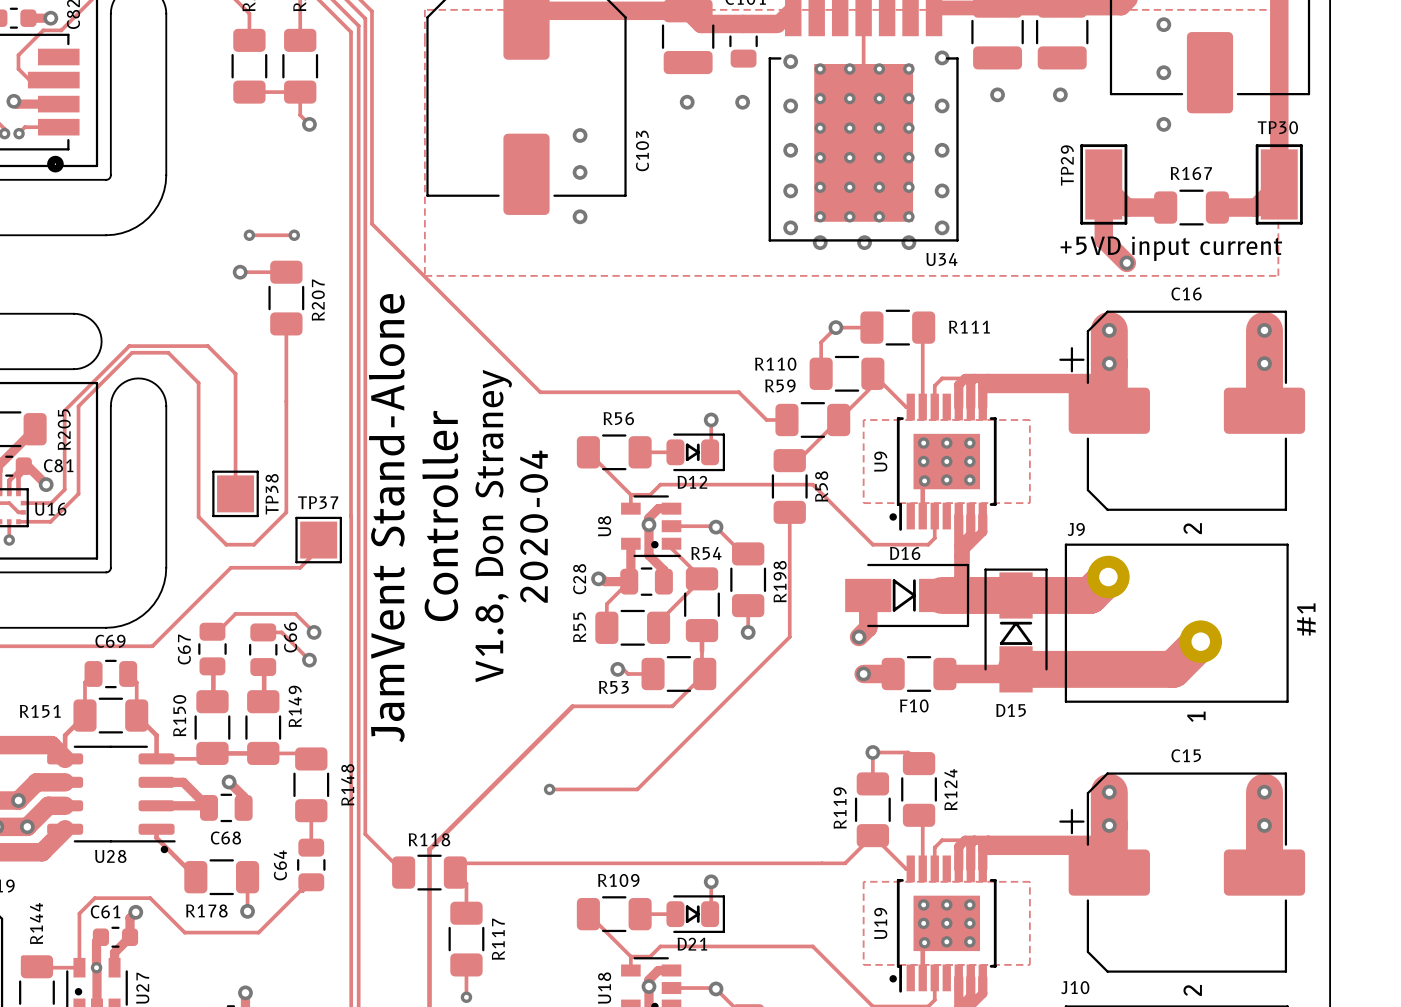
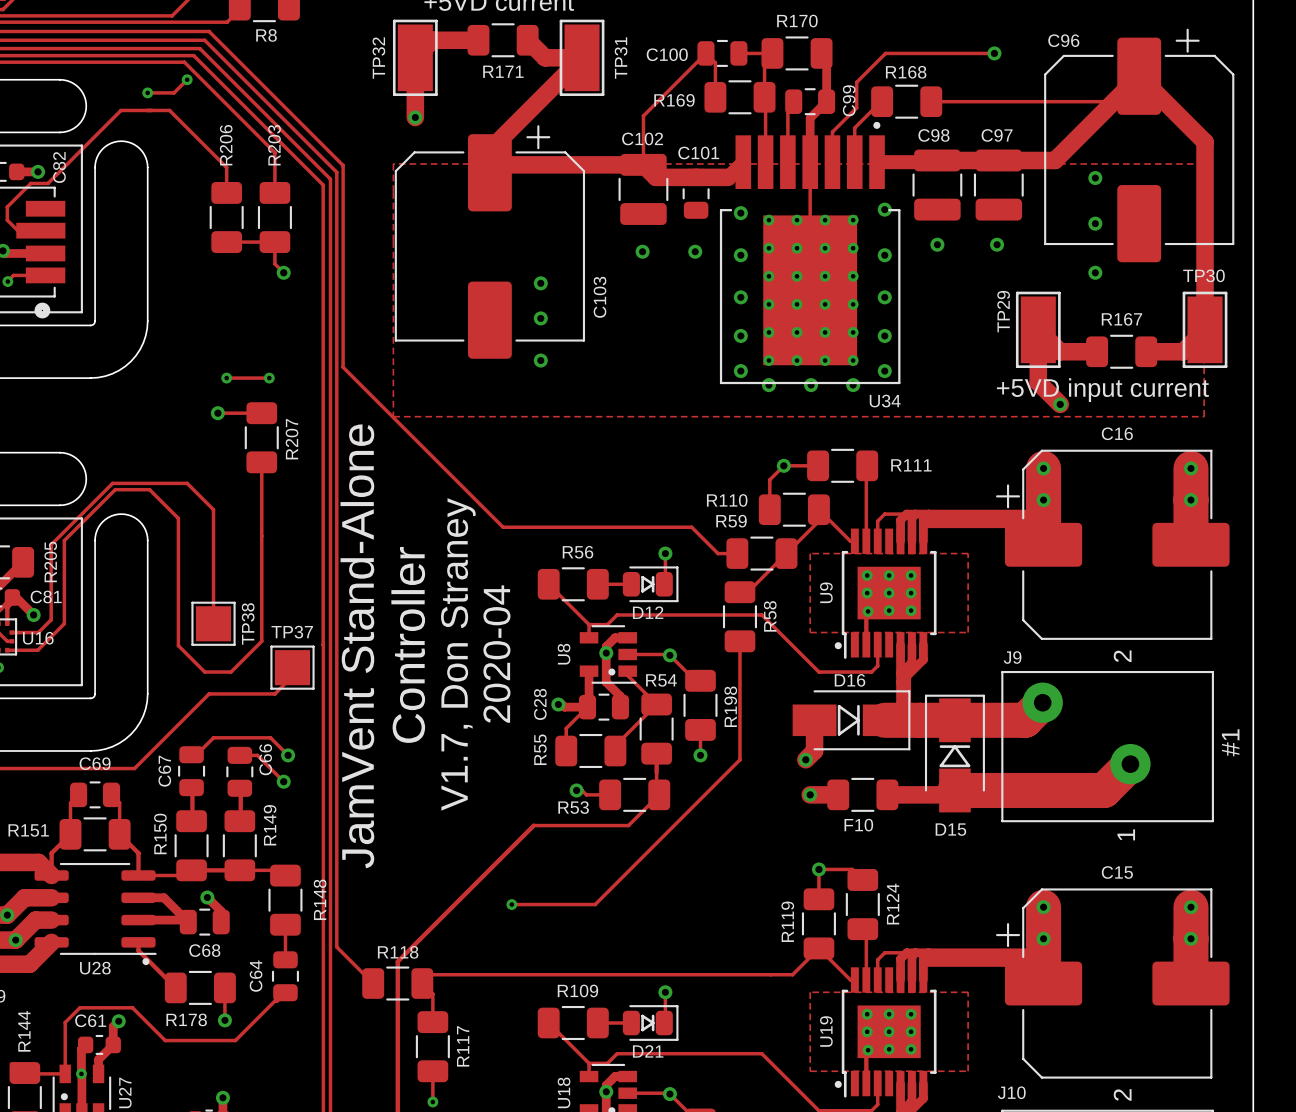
text: V1.8, Don Straney (493, 526) -> V1.7, Don Straney (458, 654)

